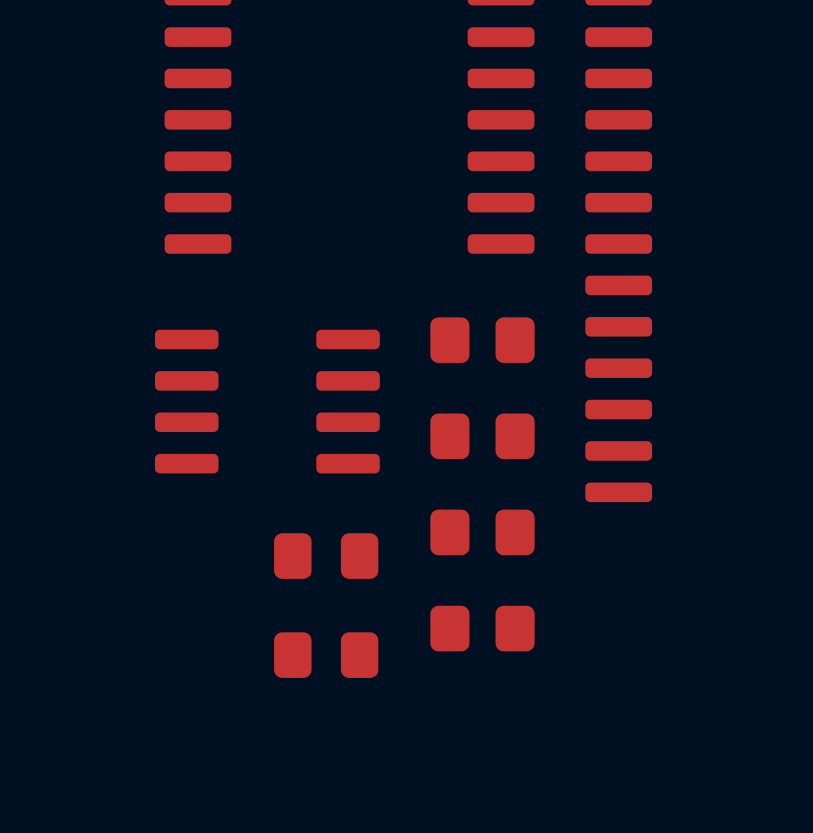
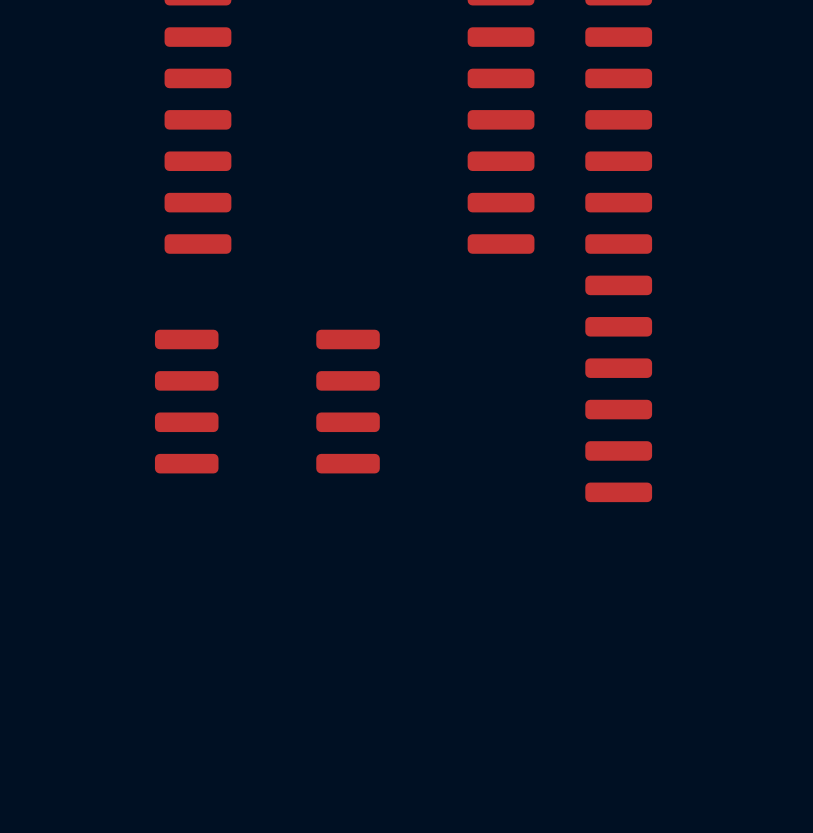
part: (482, 340) -> none
part: (482, 436) -> none
part: (482, 532) -> none
part: (326, 556) -> none
part: (482, 628) -> none
part: (326, 655) -> none

